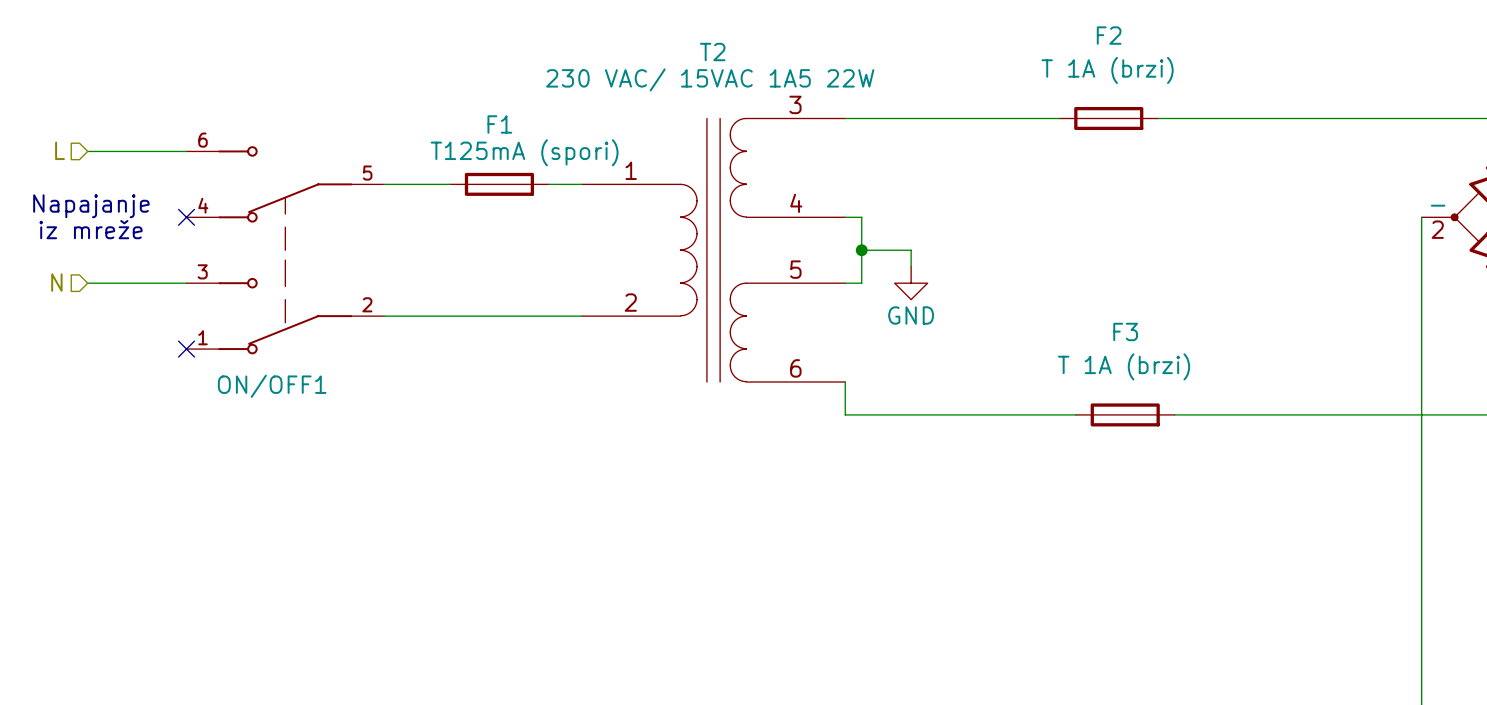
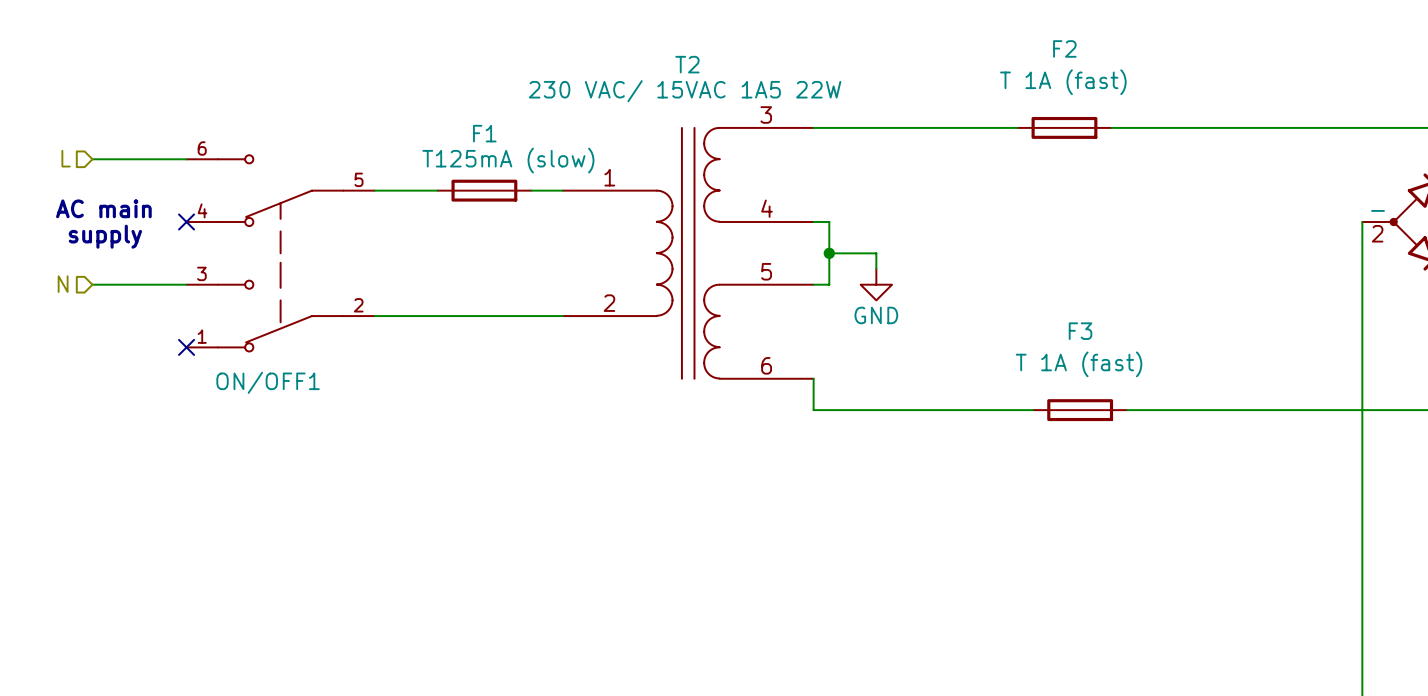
F2 value: T 1A (brzi) (1107, 70) -> T 1A (fast) (1063, 82)
F1 value: T125mA (spori) (524, 152) -> T125mA (slow) (508, 160)
text: Napajanje (91, 206) -> AC main (103, 208)
text: iz mreže (91, 229) -> supply (105, 236)
F3 value: T 1A (brzi) (1124, 366) -> T 1A (fast) (1079, 364)

